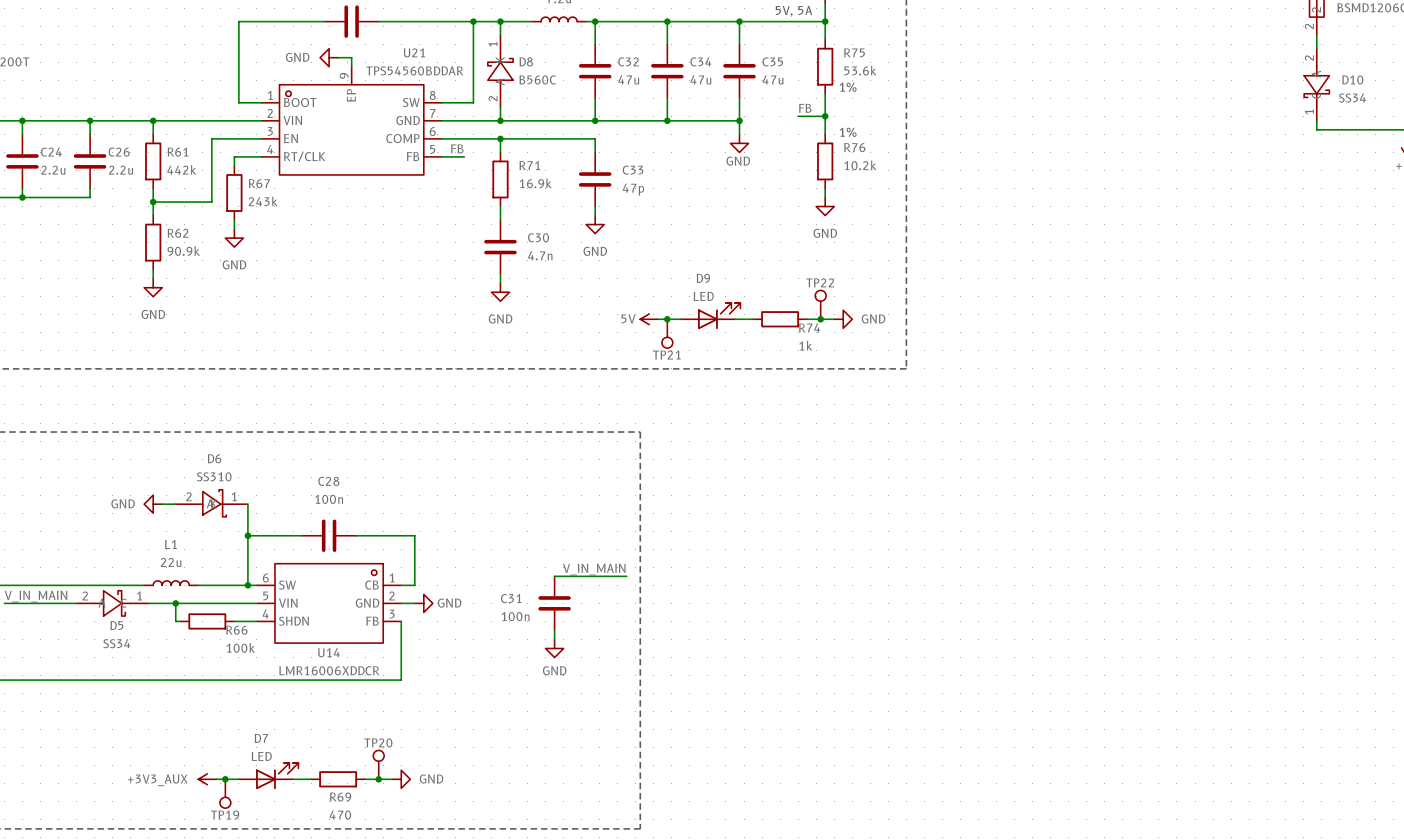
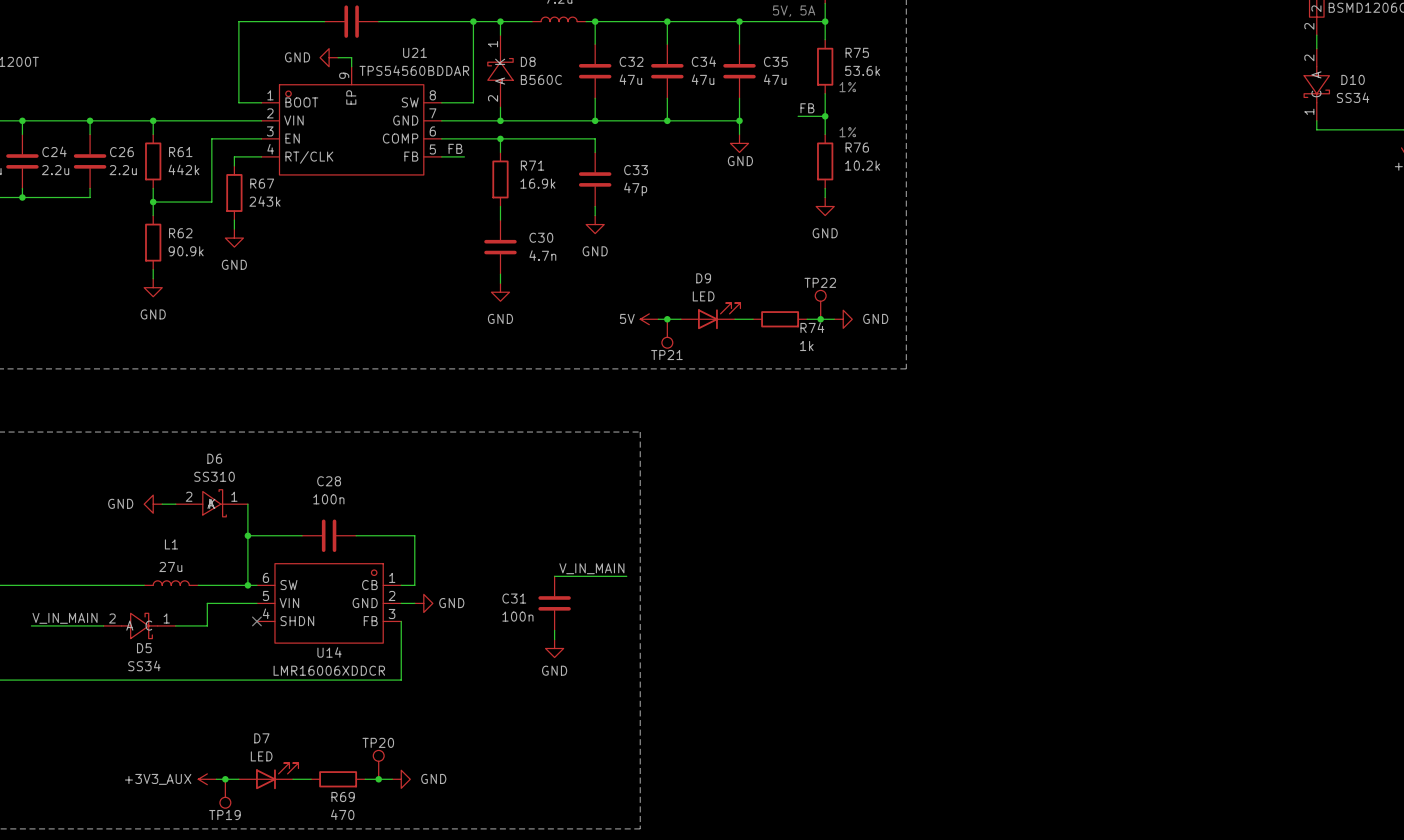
L1 value: 22u (171, 562) -> 27u (170, 566)
label position: V_IN_MAIN (36, 596) -> V_IN_MAIN (65, 618)
wire: (4, 603) (76, 603) -> (31, 625) (103, 625)
D5 position: (112, 603) -> (139, 625)
wire: (148, 603) (207, 603) -> (175, 625) (207, 625) (207, 603)
wire: (175, 603) (175, 621) (180, 621) -> none
junction: (175, 603) -> none
R66: 100k (207, 621) -> none
wire: (234, 621) (256, 621) -> none
no-connect mark: none -> (256, 621)

